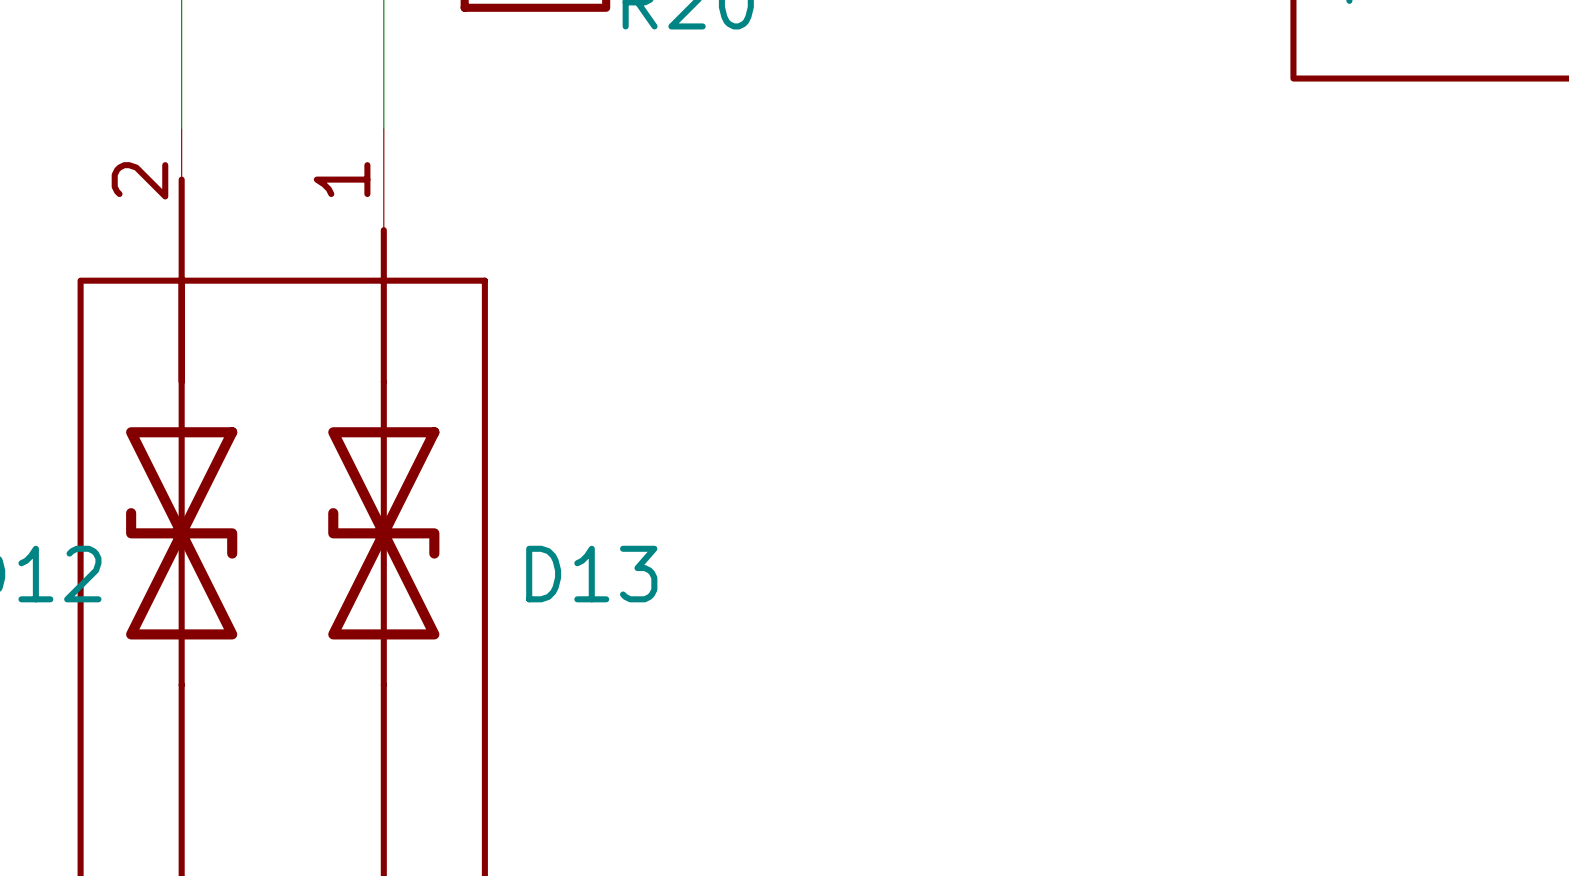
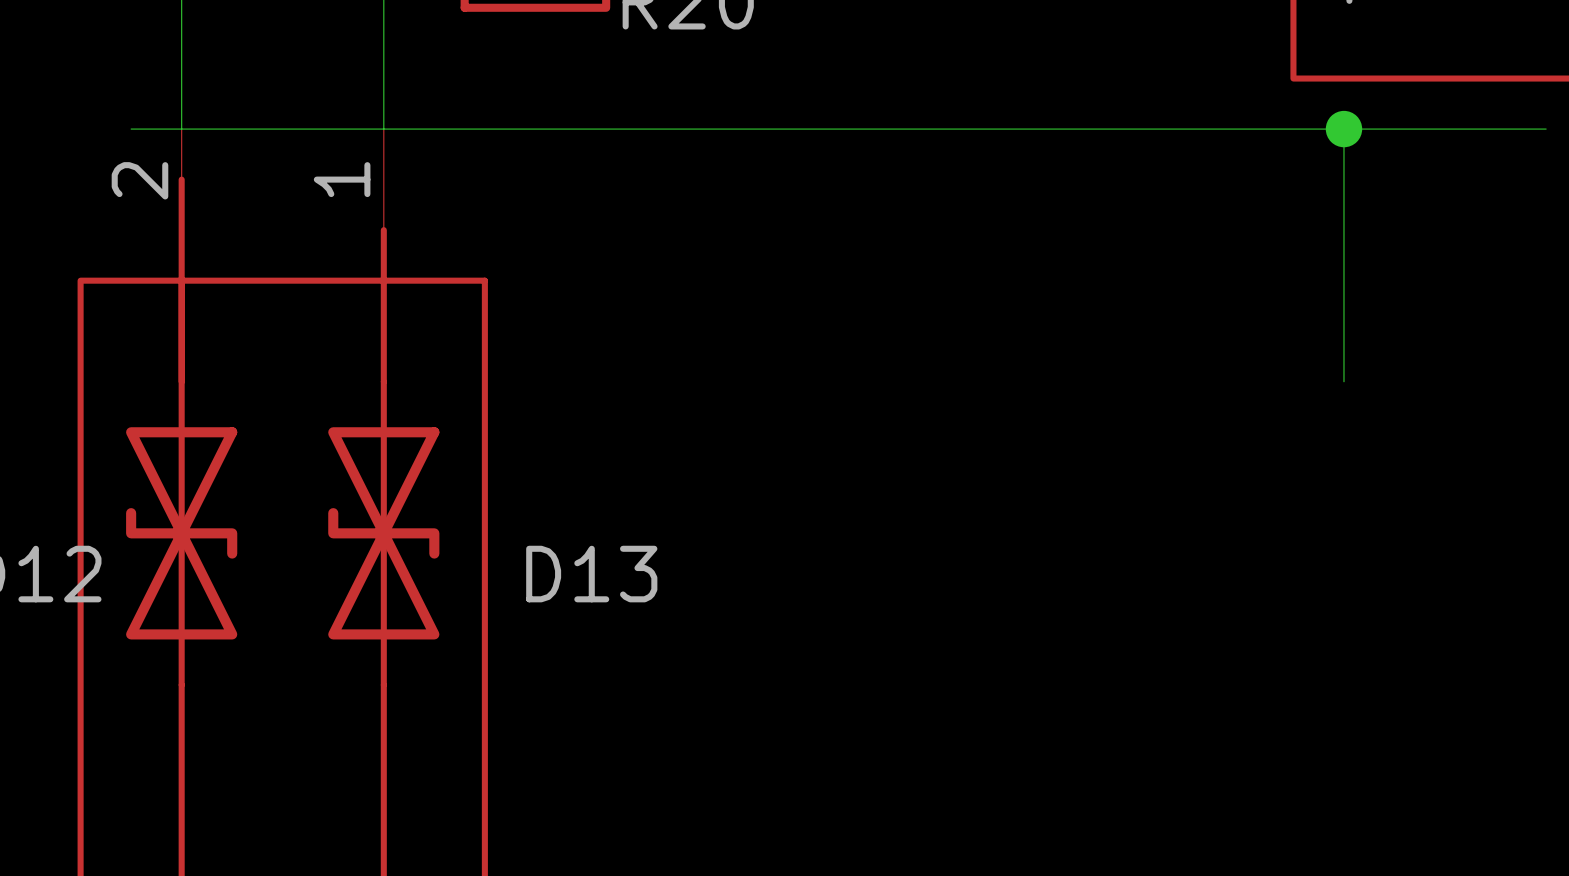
wire: none -> (131, 129) (1546, 129)
wire: none -> (1343, 129) (1343, 381)
junction: none -> (1343, 129)

